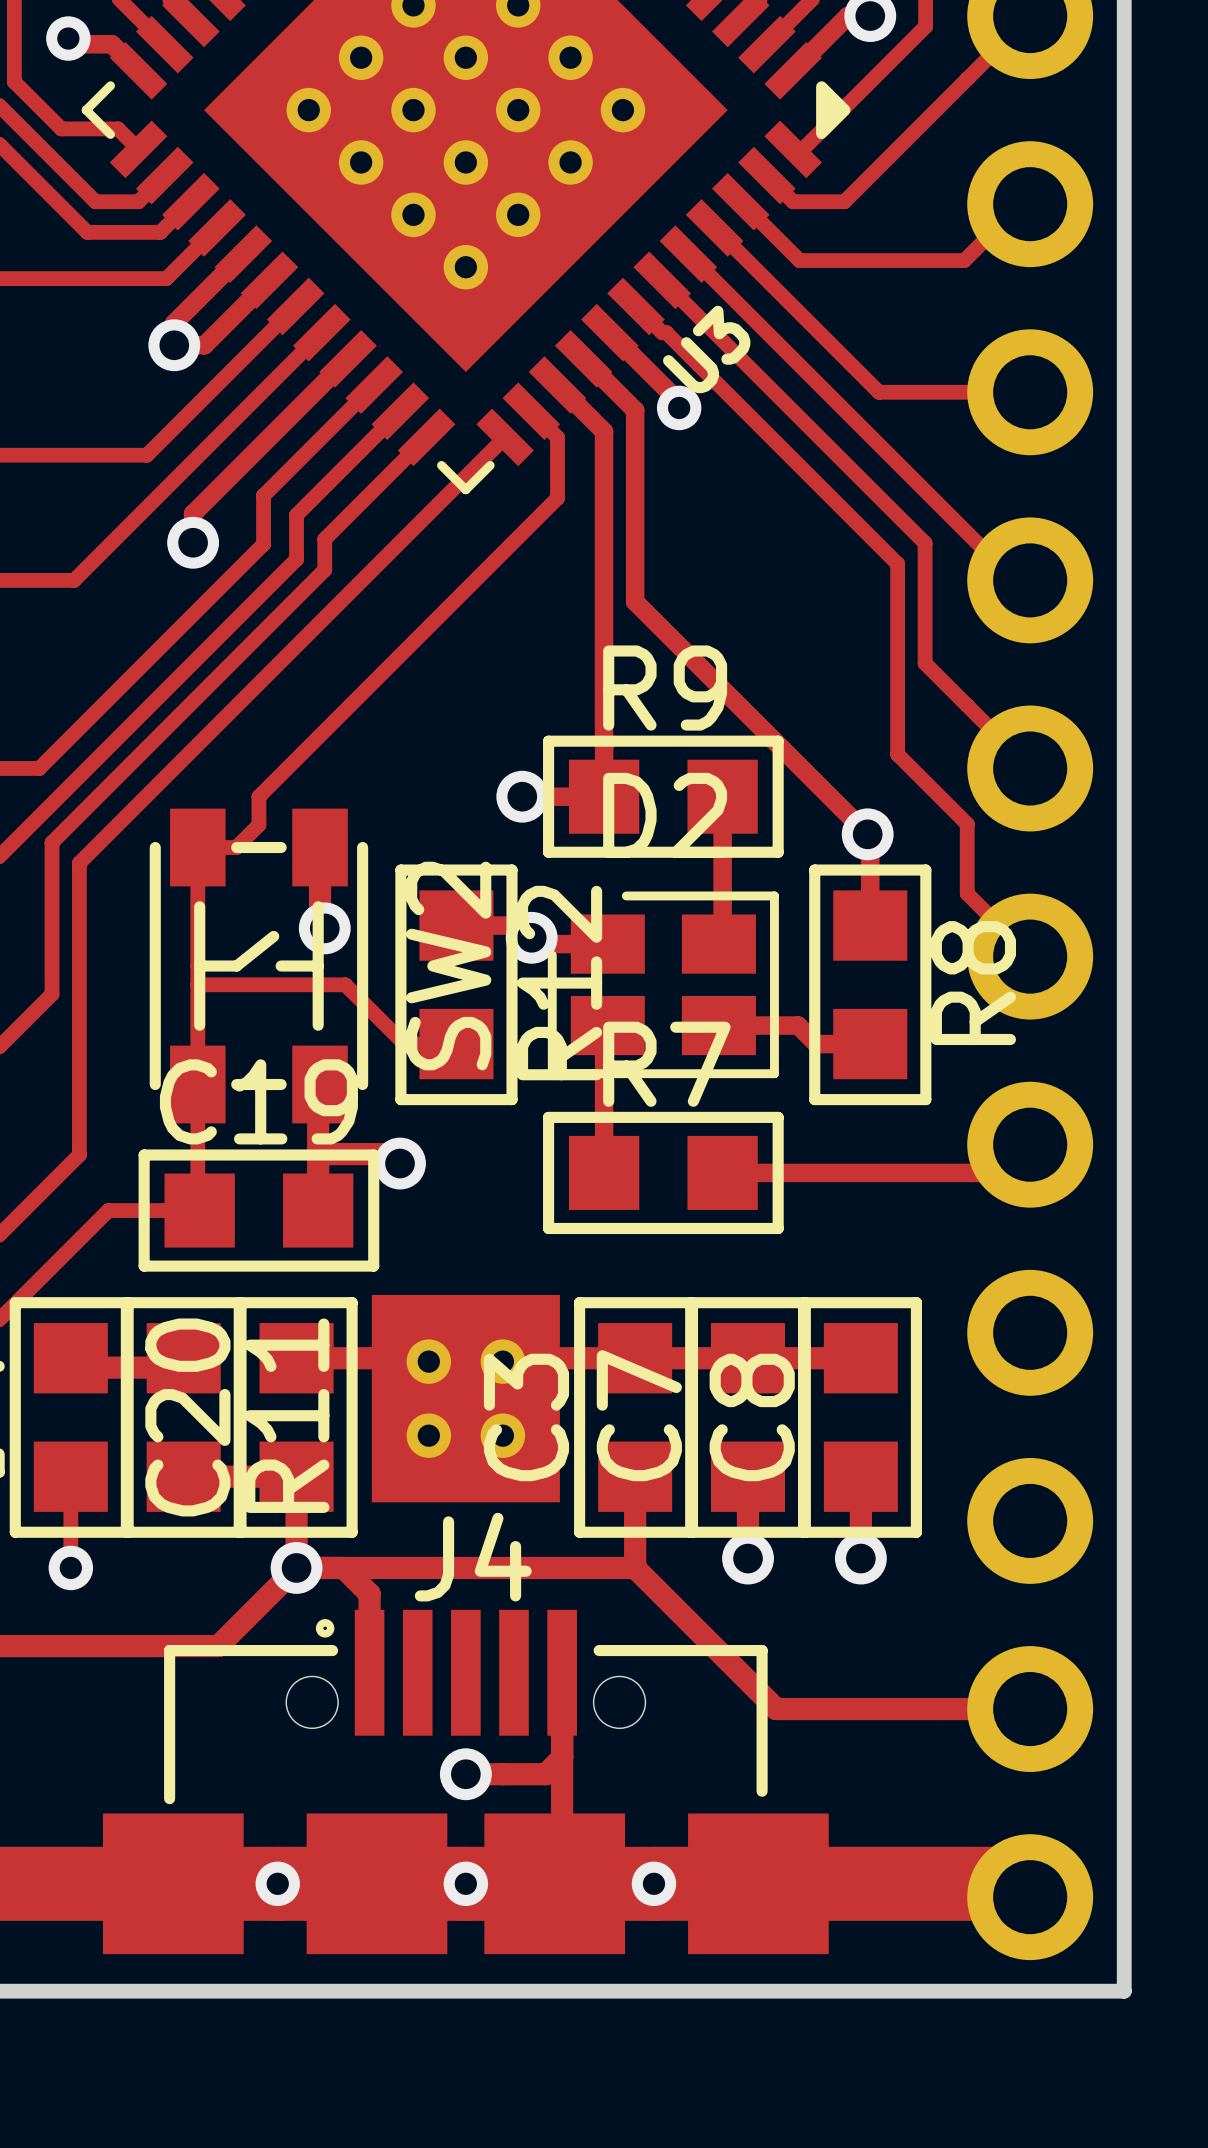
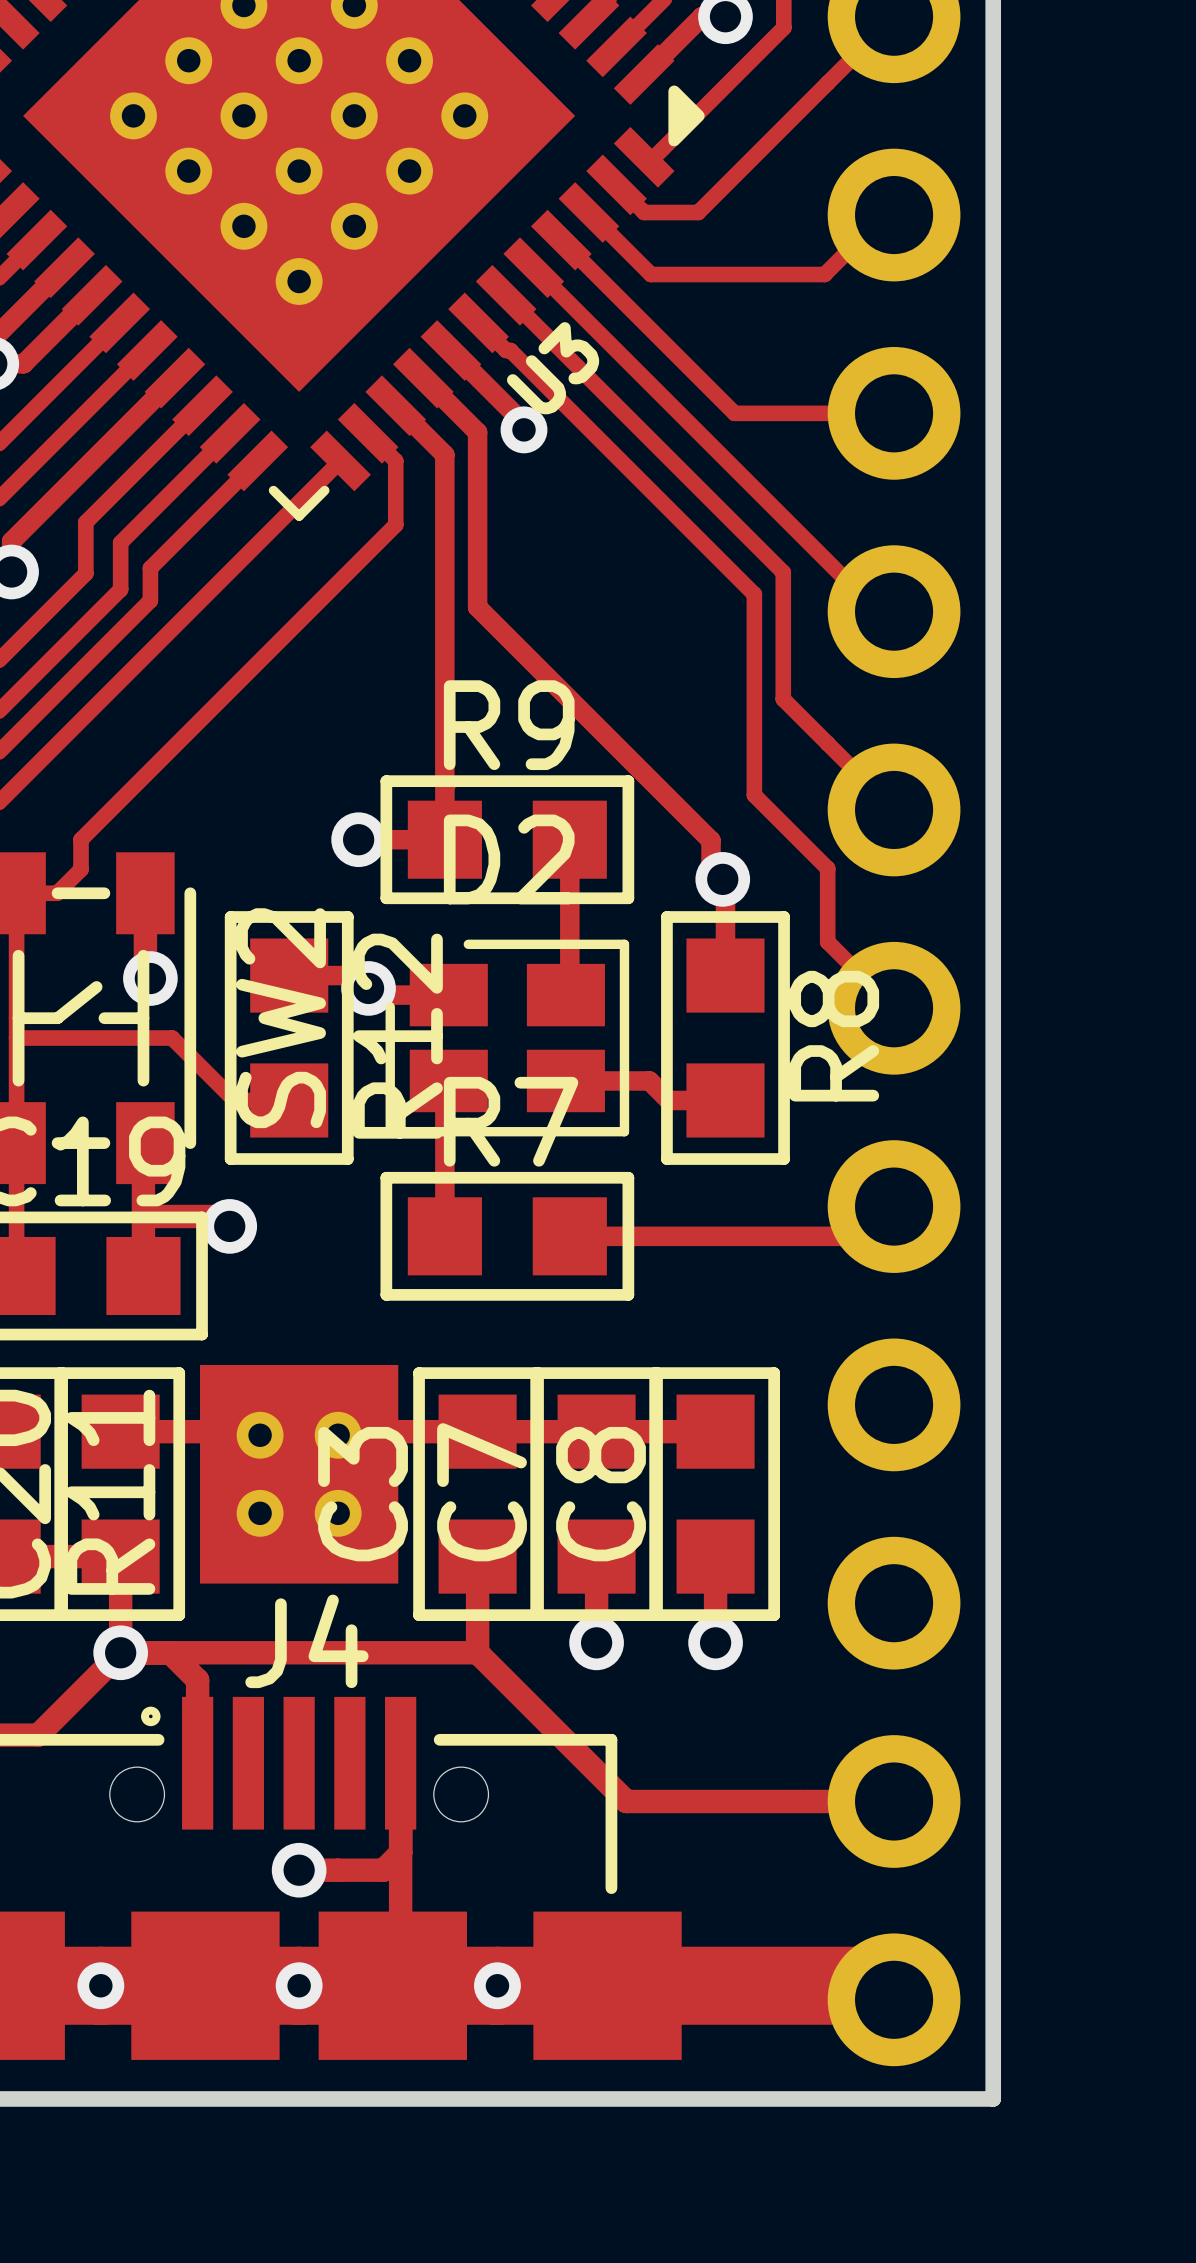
track: (635, 576) (635, 601) (870, 836) (870, 848) -> (477, 607) (711, 840) (711, 879) (725, 893)

